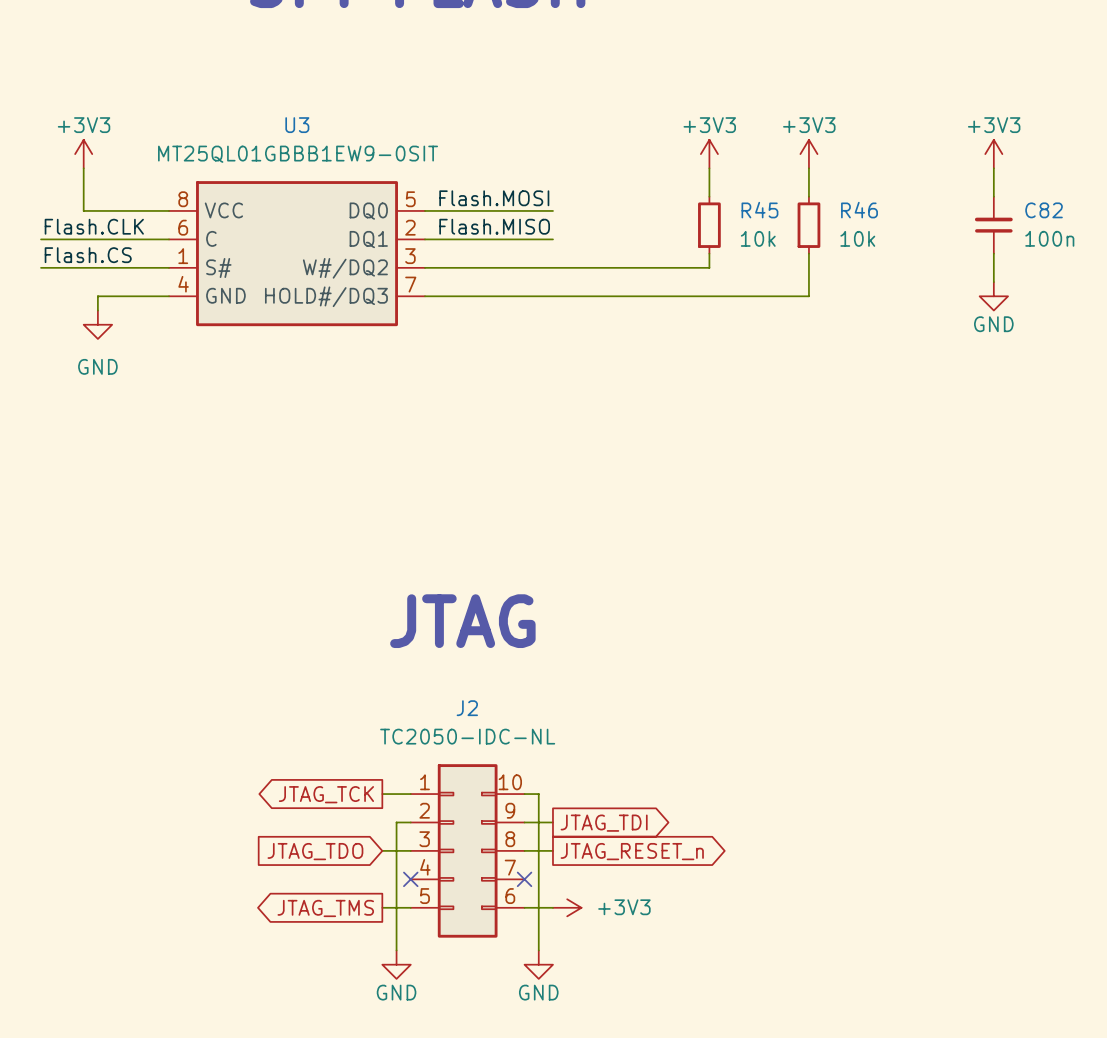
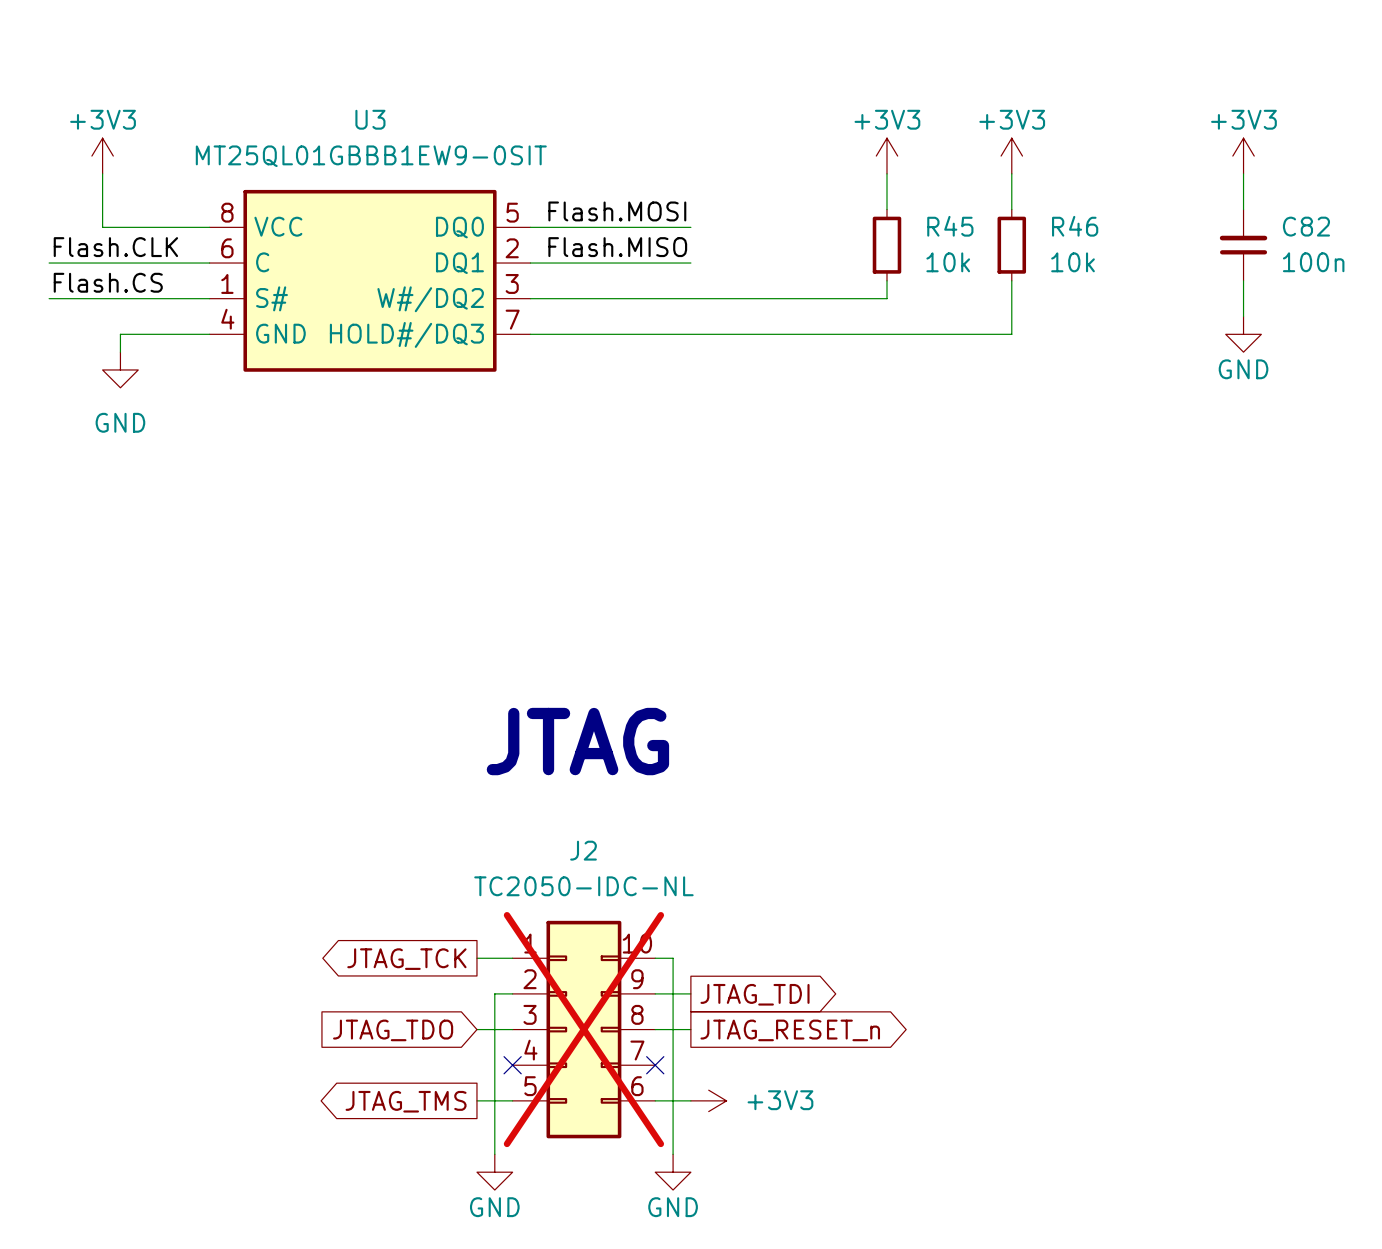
J2 do-not-place cross: none -> (583, 1029)

